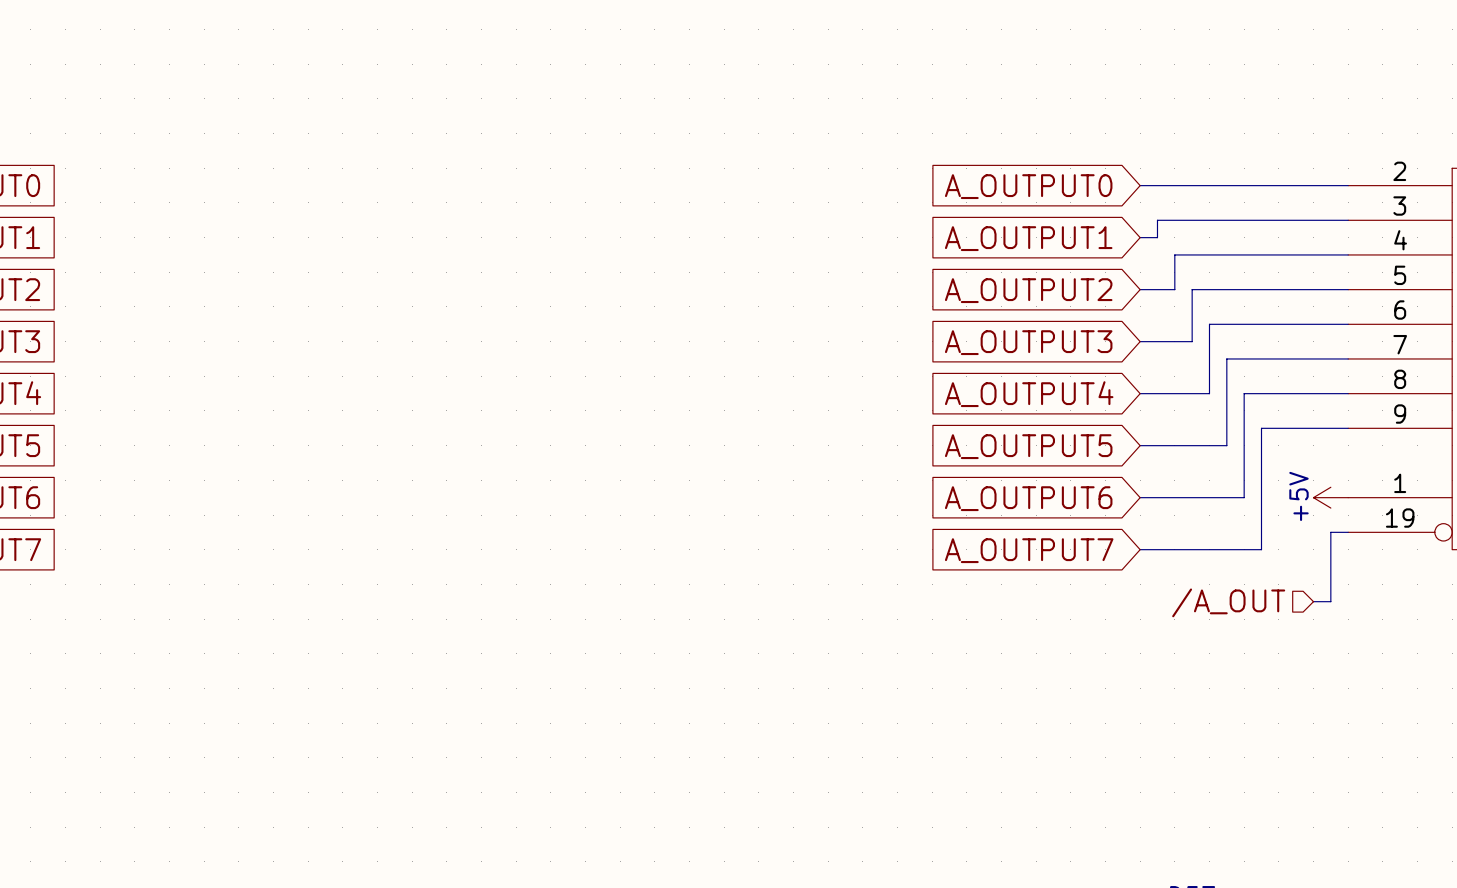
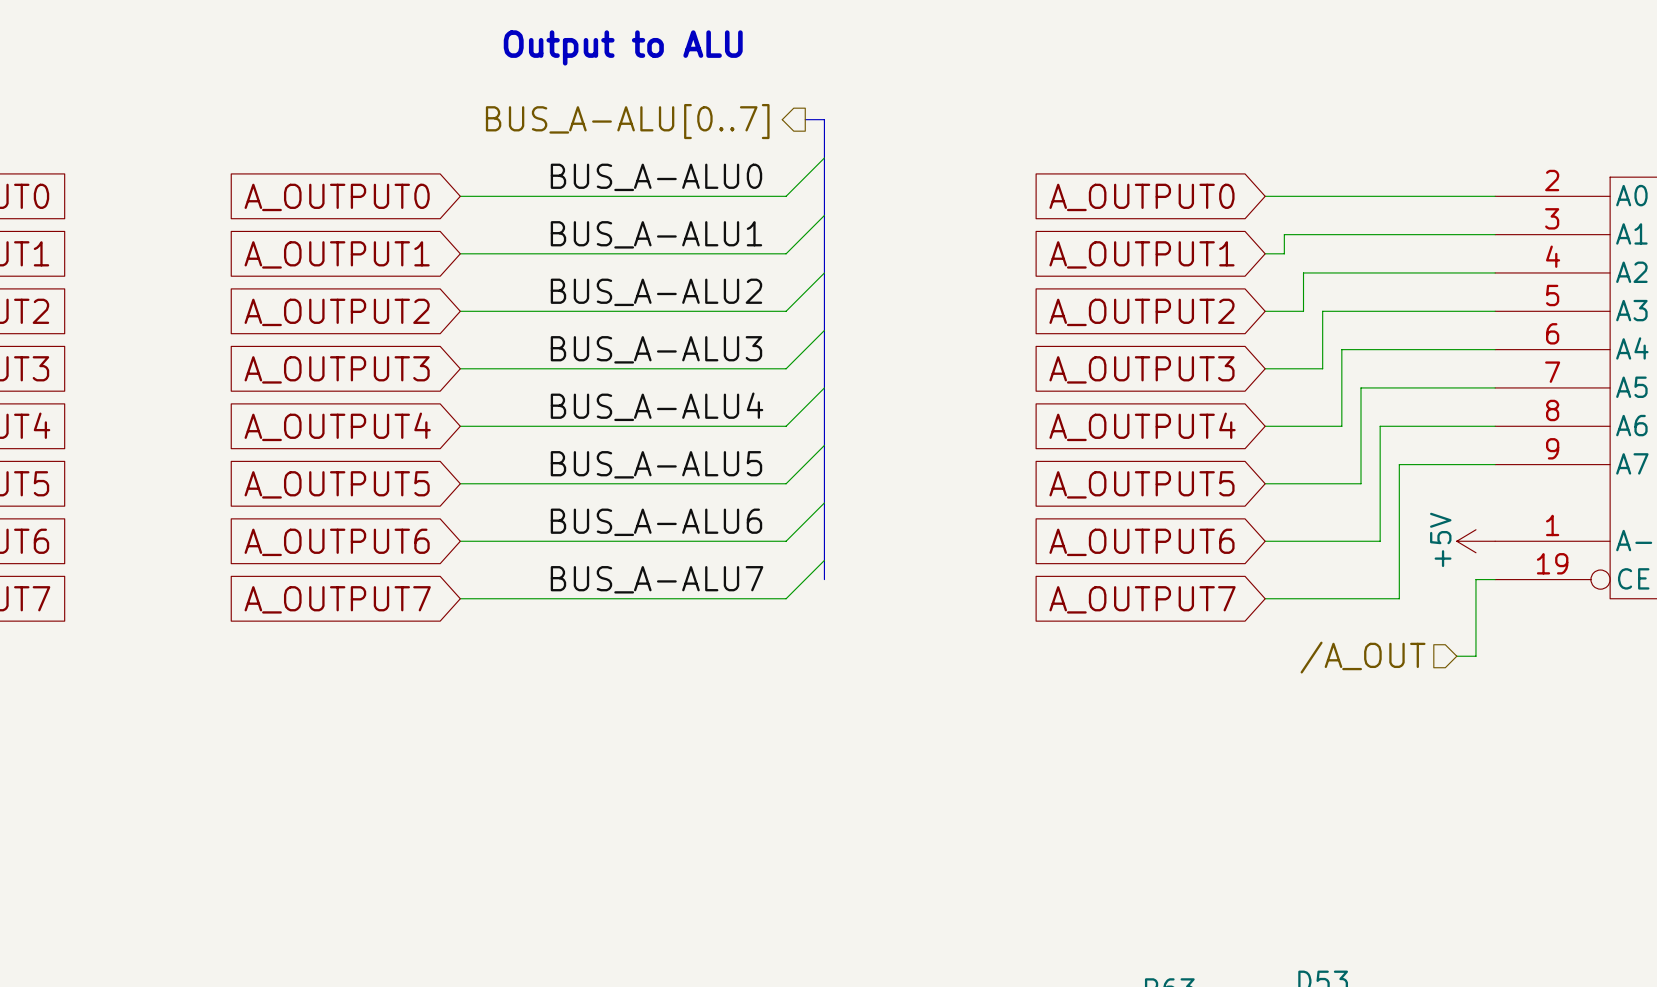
text: none -> Output to ALU (623, 47)
bus: none -> (805, 119) (824, 119) (824, 579)
hierarchical label: none -> BUS_A-ALU[0..7] (627, 121)
wire: none -> (824, 157) (786, 196) (460, 196)
label: none -> BUS_A-ALU0 (656, 177)
global label: none -> A_OUTPUT0 (337, 197)
wire: none -> (824, 215) (786, 253) (460, 253)
label: none -> BUS_A-ALU1 (656, 234)
global label: none -> A_OUTPUT1 (337, 254)
wire: none -> (824, 272) (786, 311) (460, 311)
label: none -> BUS_A-ALU2 (656, 292)
global label: none -> A_OUTPUT2 (337, 312)
wire: none -> (824, 330) (786, 368) (460, 368)
label: none -> BUS_A-ALU3 (656, 349)
global label: none -> A_OUTPUT3 (337, 369)
wire: none -> (824, 387) (786, 426) (460, 426)
label: none -> BUS_A-ALU4 (657, 406)
global label: none -> A_OUTPUT4 (337, 426)
wire: none -> (824, 445) (786, 483) (460, 483)
label: none -> BUS_A-ALU5 (656, 464)
global label: none -> A_OUTPUT5 (337, 484)
wire: none -> (824, 502) (786, 541) (460, 541)
label: none -> BUS_A-ALU6 (656, 522)
global label: none -> A_OUTPUT6 (337, 542)
wire: none -> (824, 560) (786, 598) (460, 598)
label: none -> BUS_A-ALU7 (657, 579)
global label: none -> A_OUTPUT7 (337, 599)

